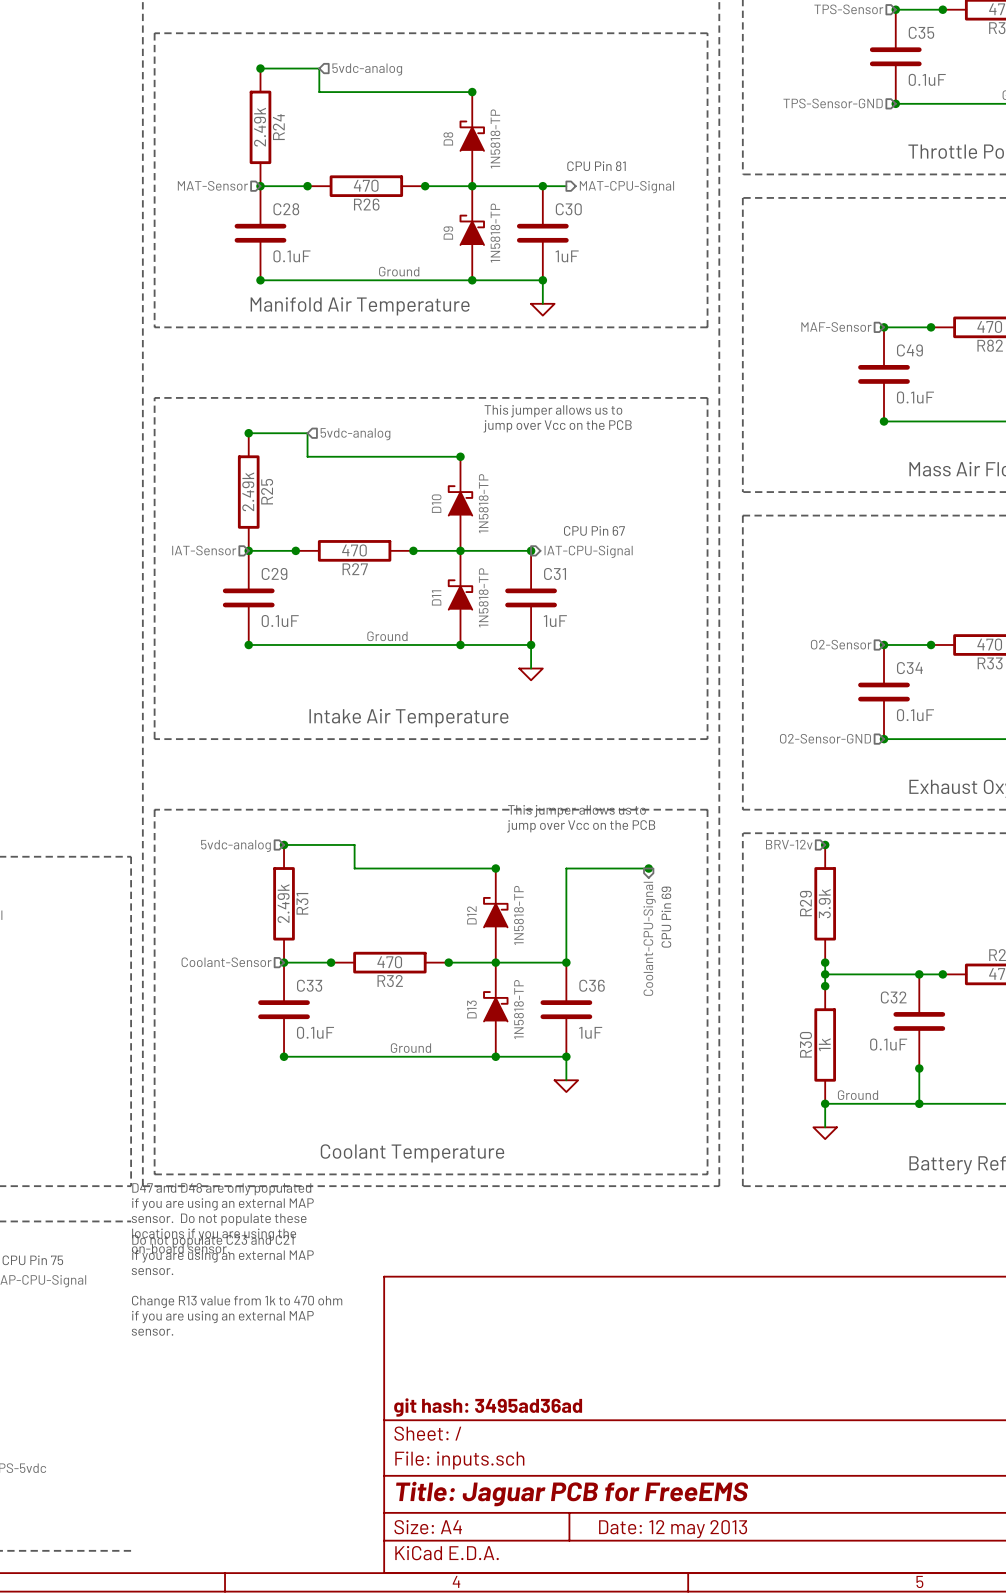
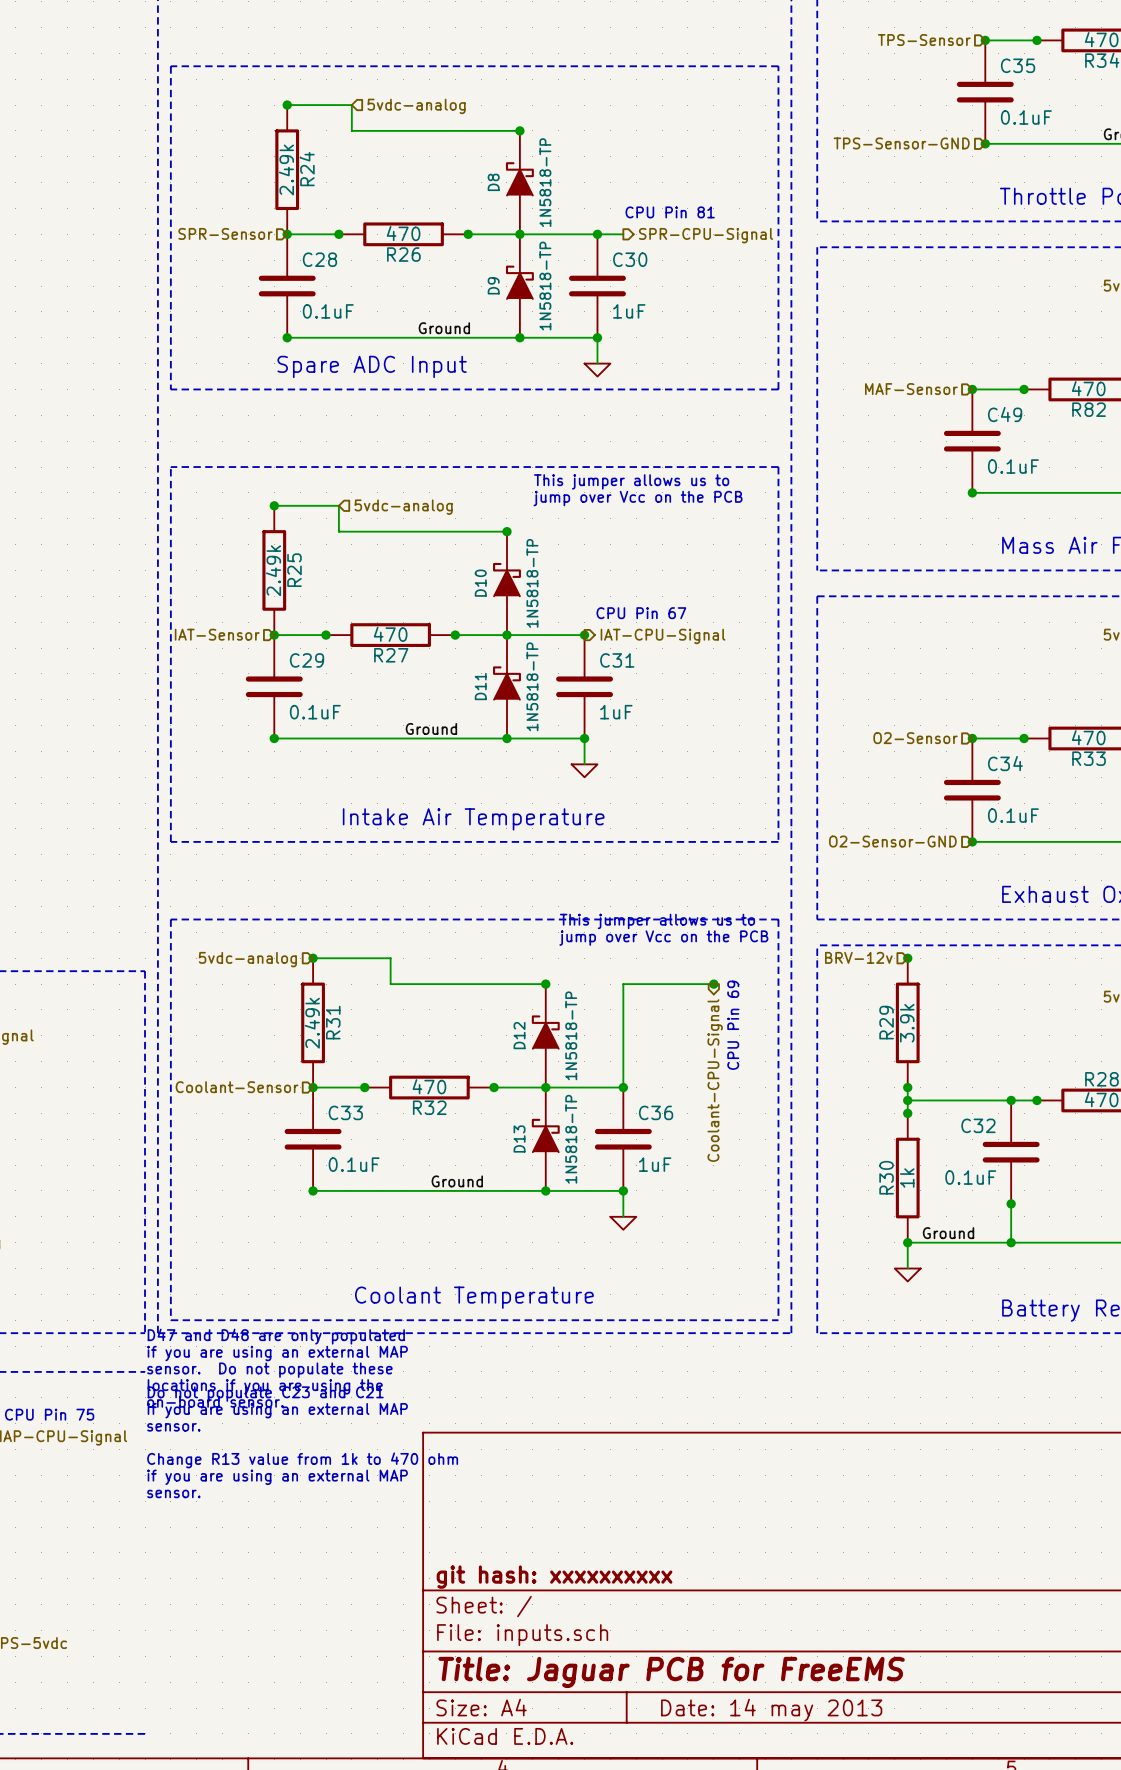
hierarchical label: MAT-Sensor (212, 185) -> SPR-Sensor (225, 233)
hierarchical label: MAT-CPU-Signal (626, 187) -> SPR-CPU-Signal (706, 235)
text: Manifold Air Temperature (360, 306) -> Spare ADC Input (372, 366)
title block: git hash: 3495ad36ad (488, 1407) -> git hash: xxxxxxxxxx (554, 1577)
title block: Date: 12 may 2013 (673, 1529) -> Date: 14 may 2013 (771, 1710)

